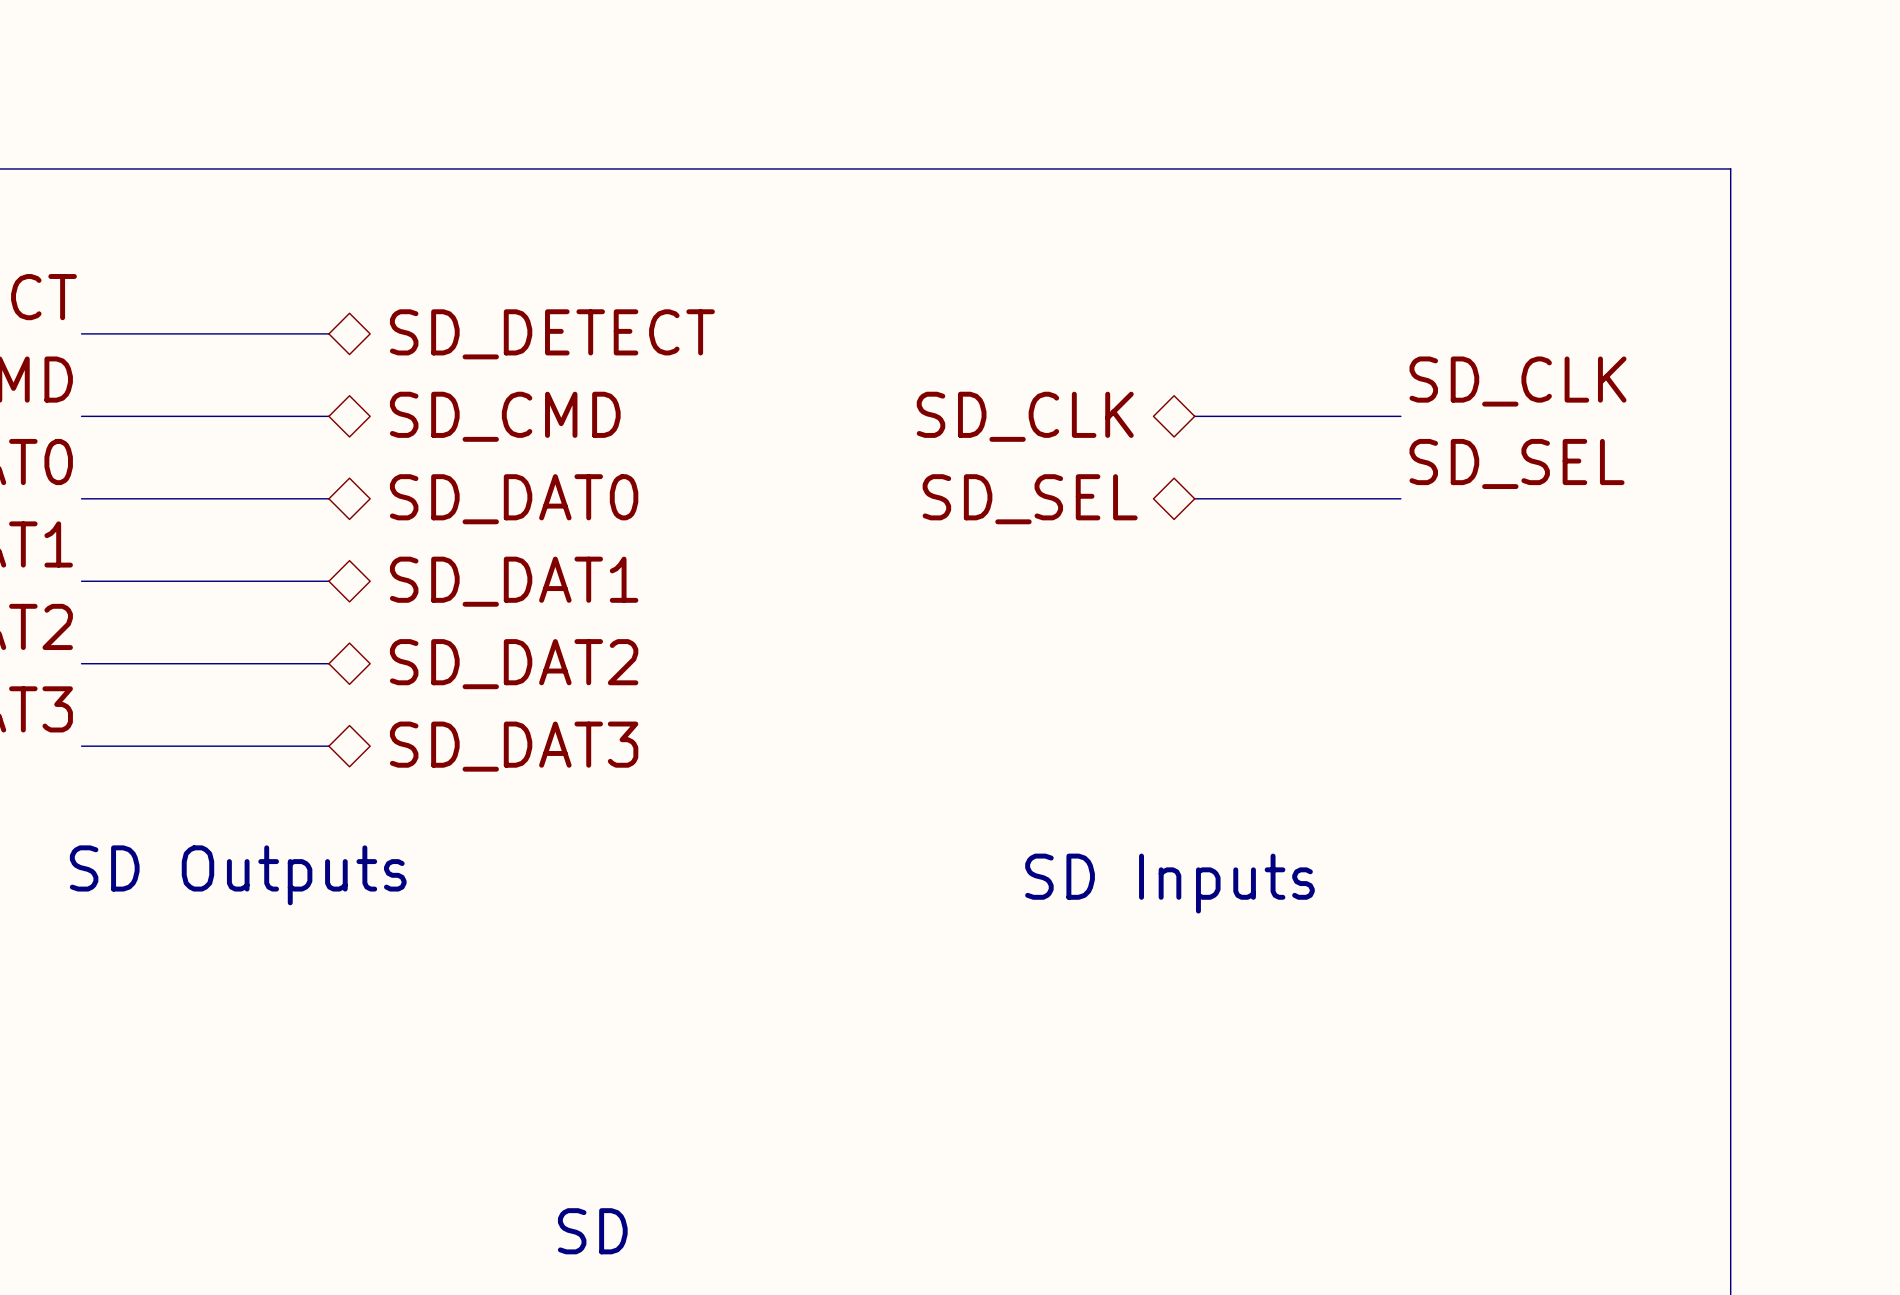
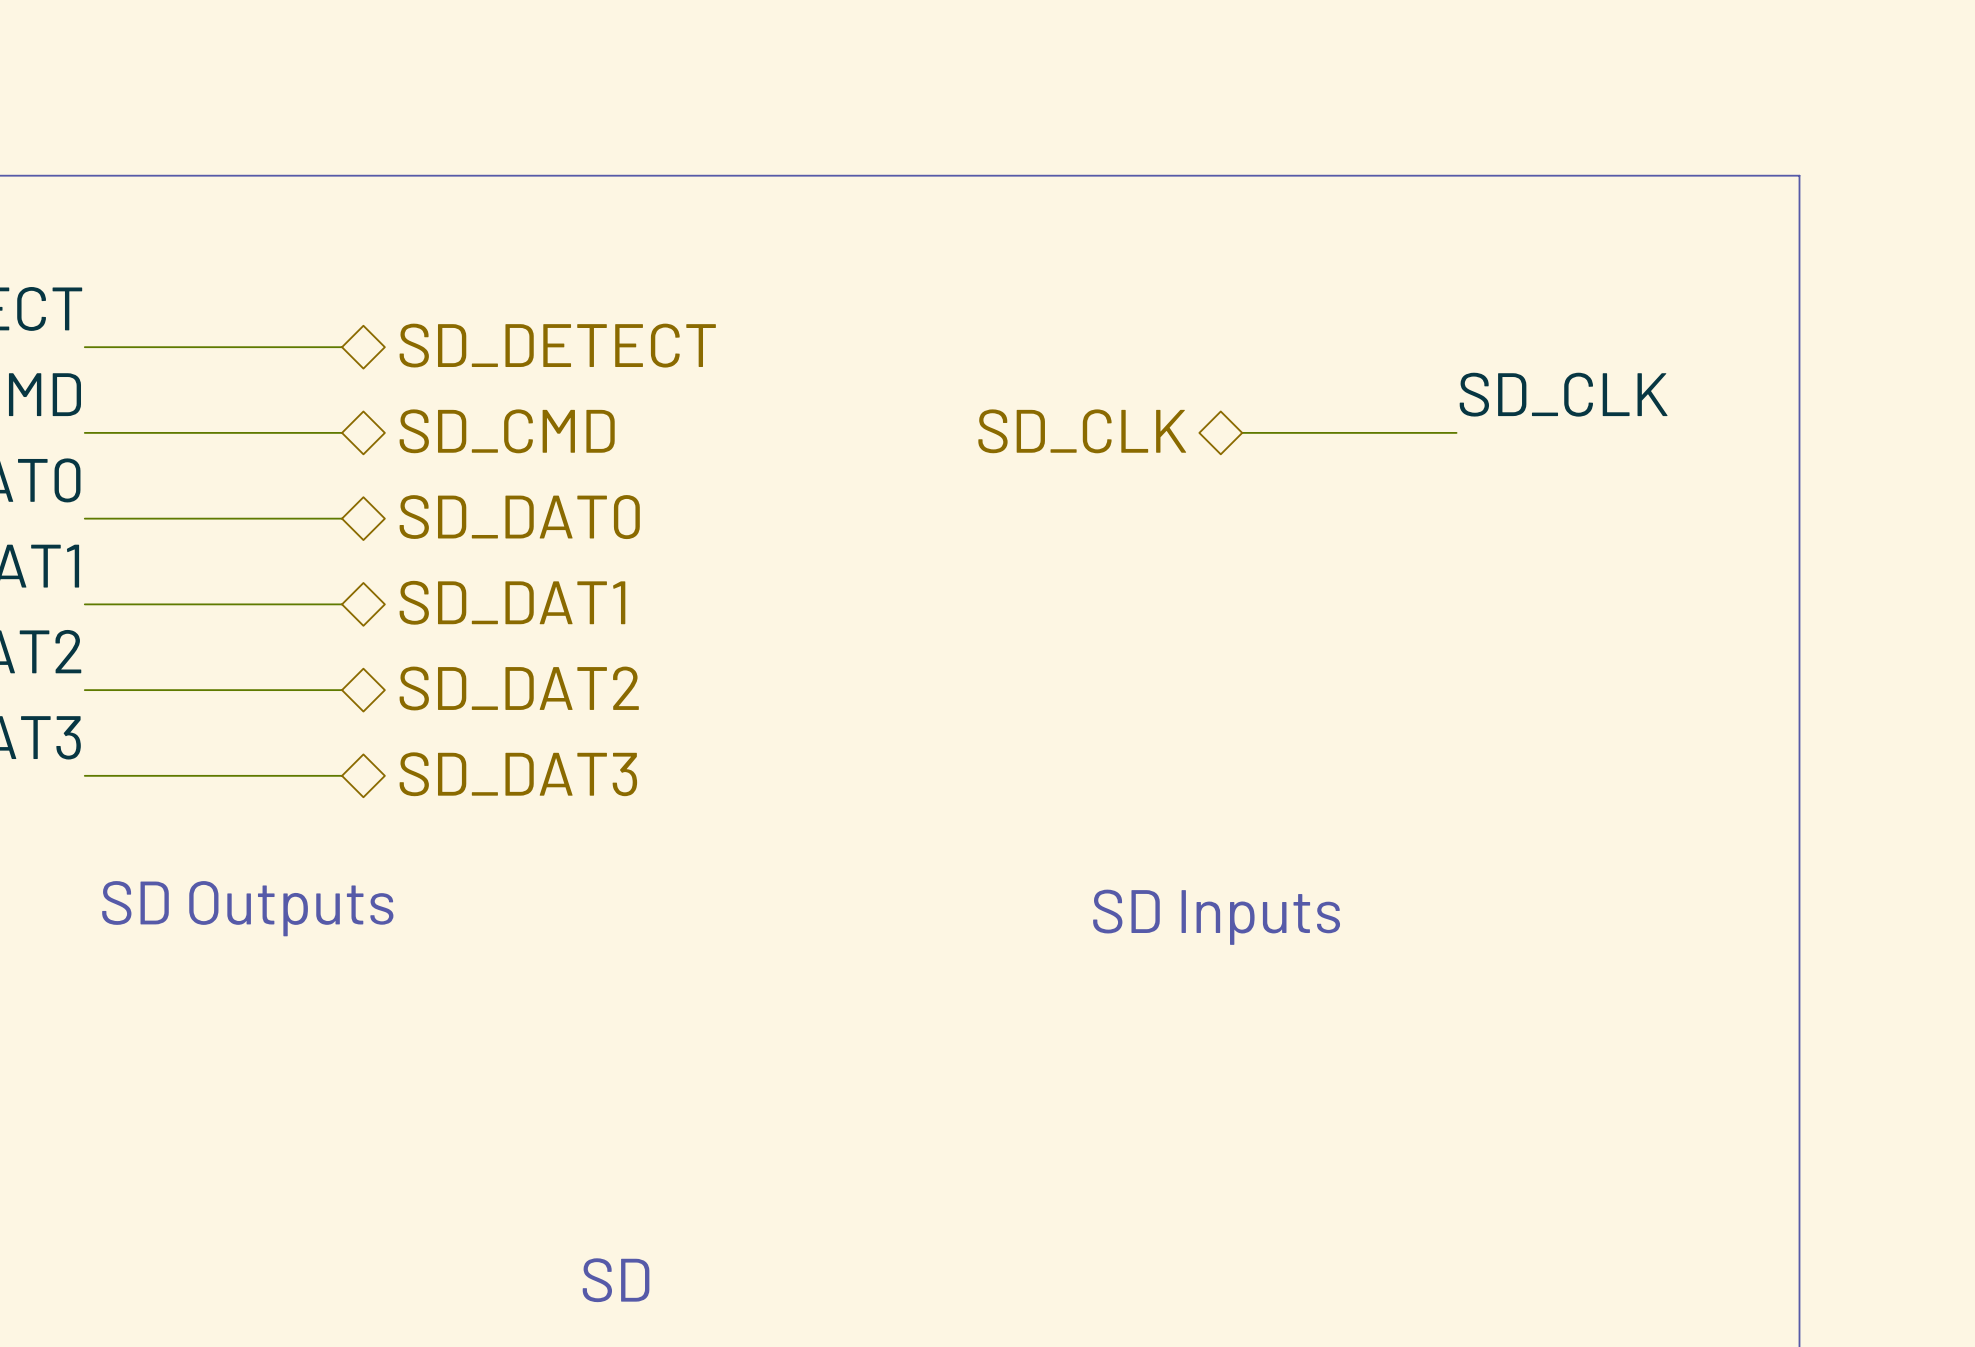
label: SD_SEL (1517, 463) -> none
wire: (1194, 498) (1400, 498) -> none
hierarchical label: SD_SEL (1030, 499) -> none

